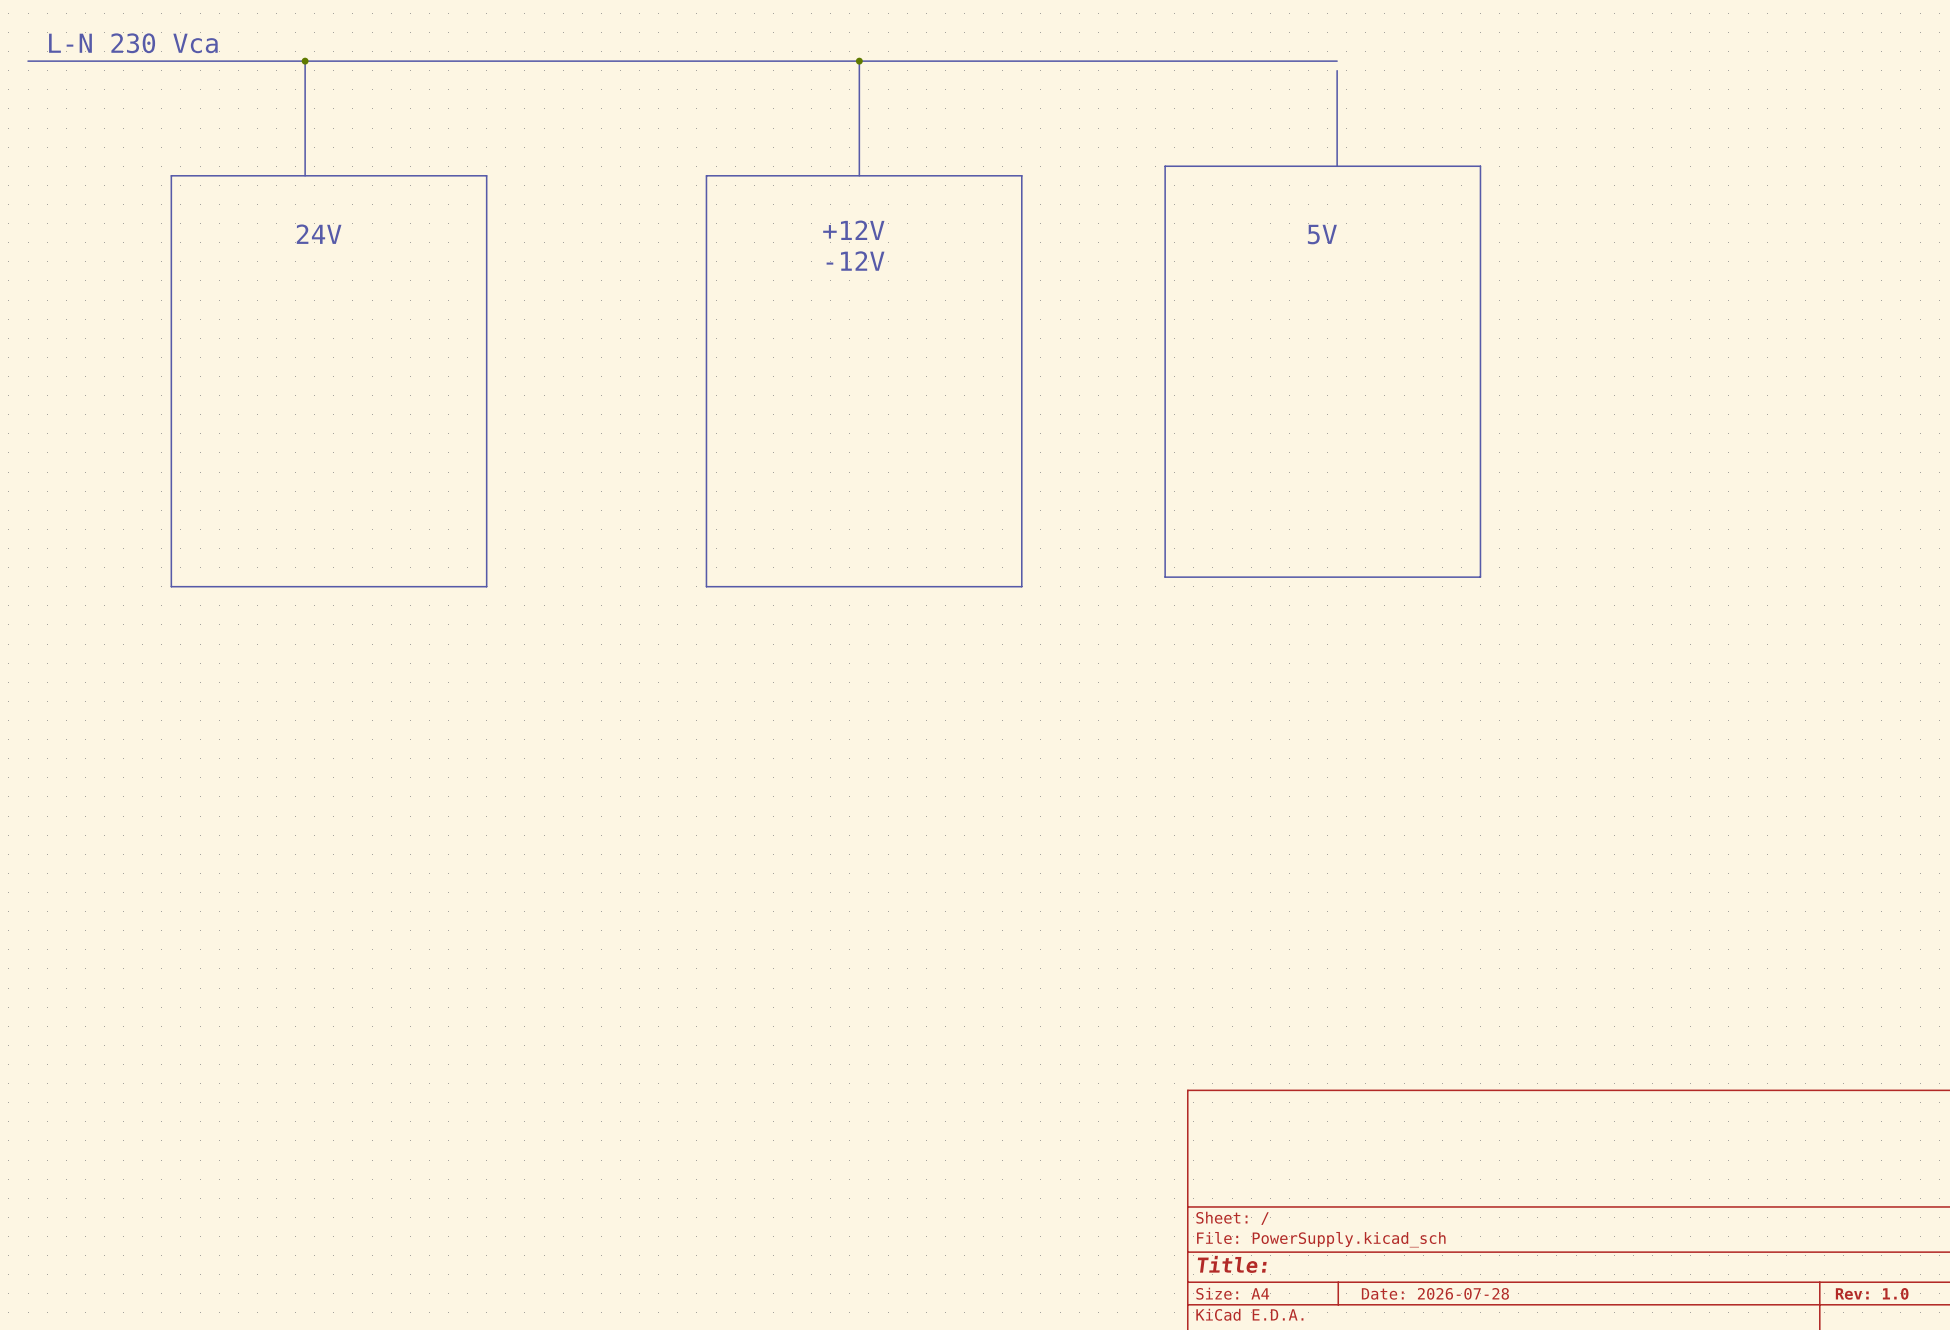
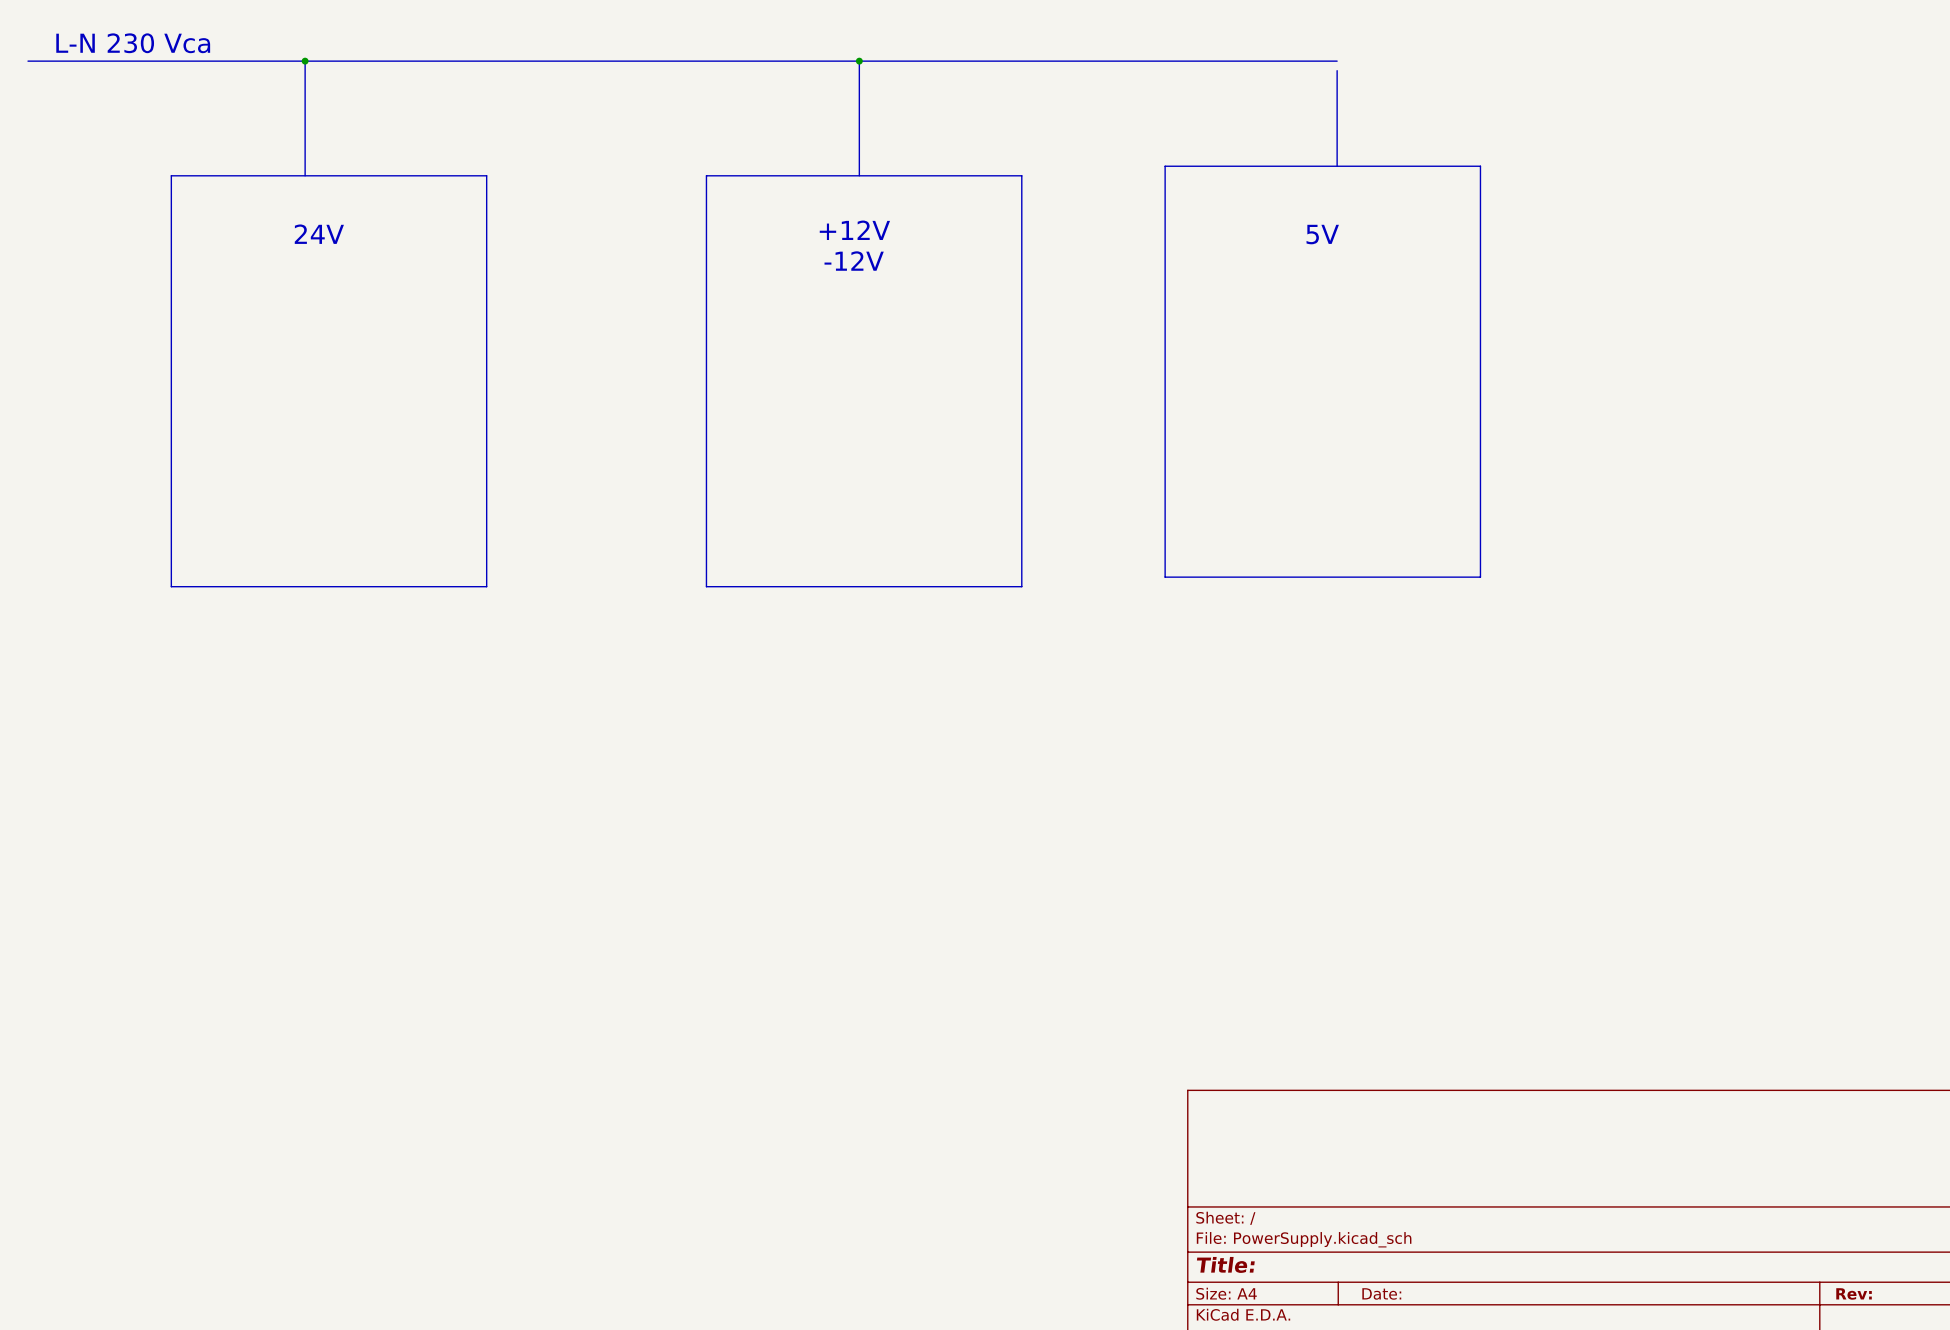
title block: Date: 2026-07-28 (1435, 1293) -> Date: (1381, 1293)
title block: Rev: 1.0 (1872, 1293) -> Rev: (1854, 1293)

